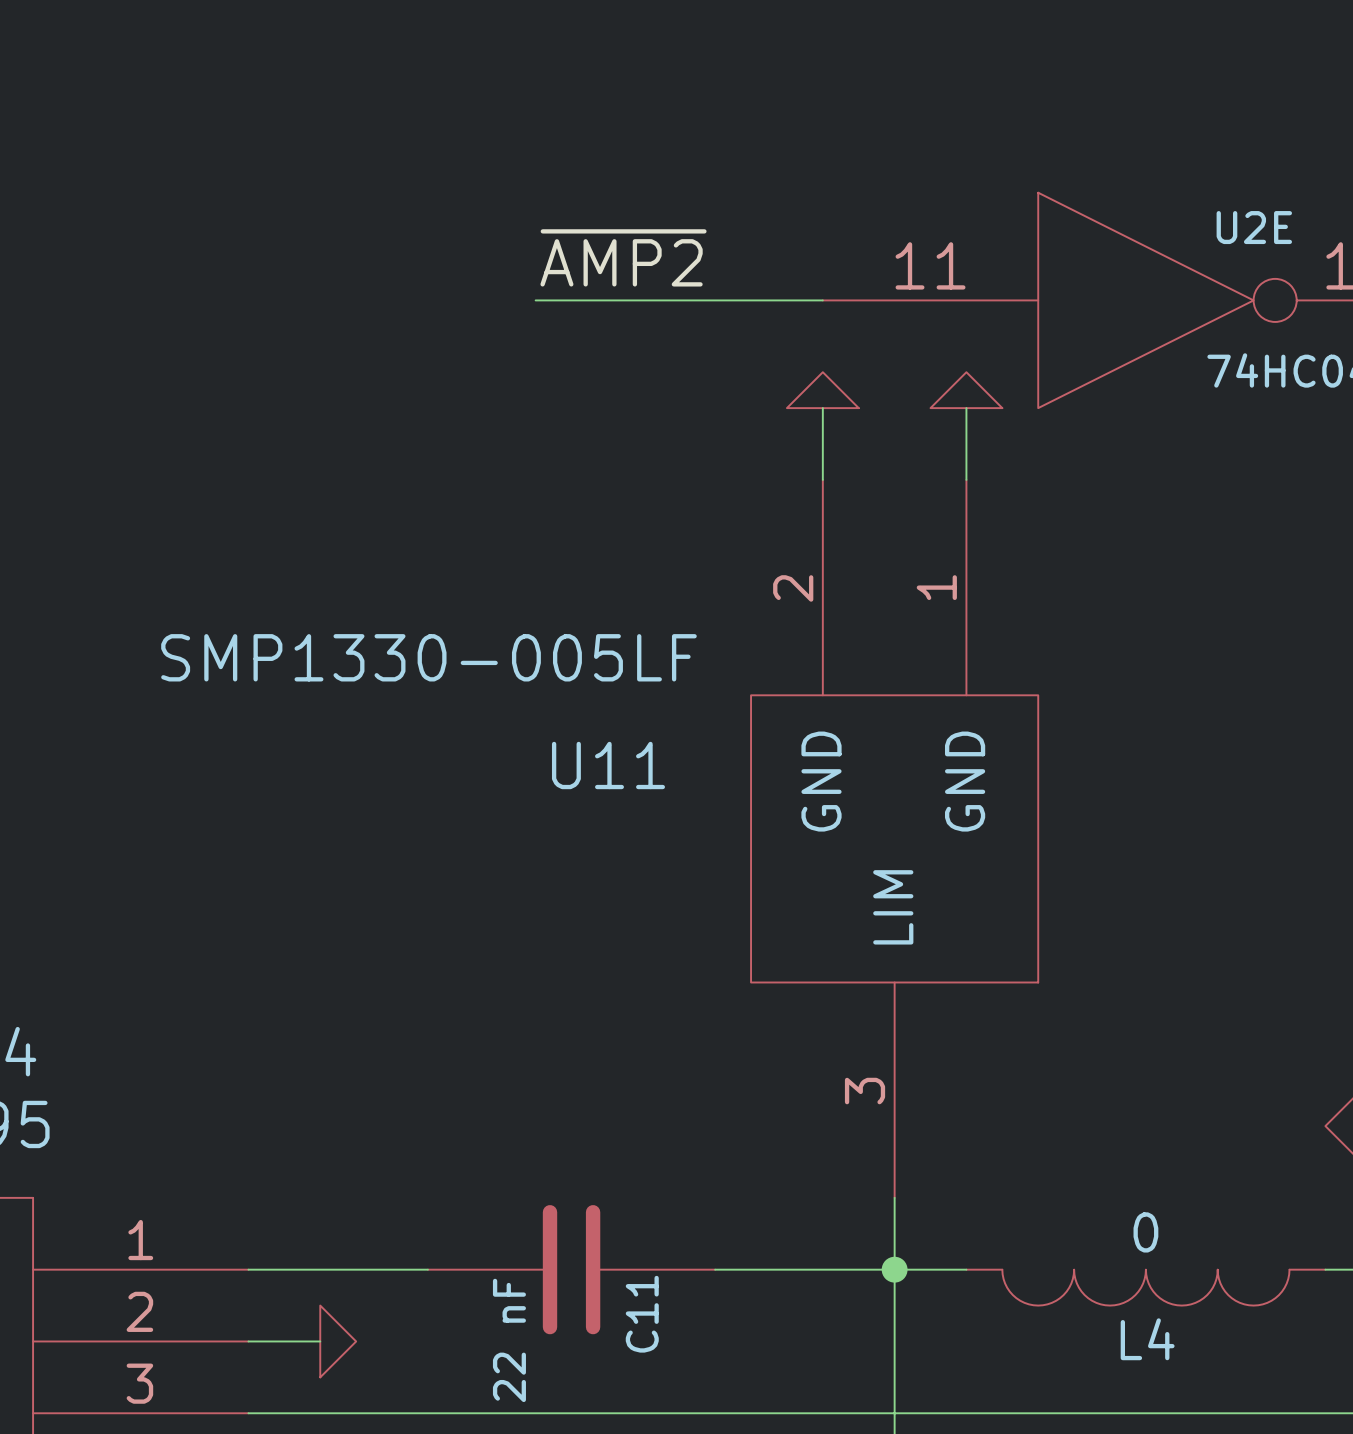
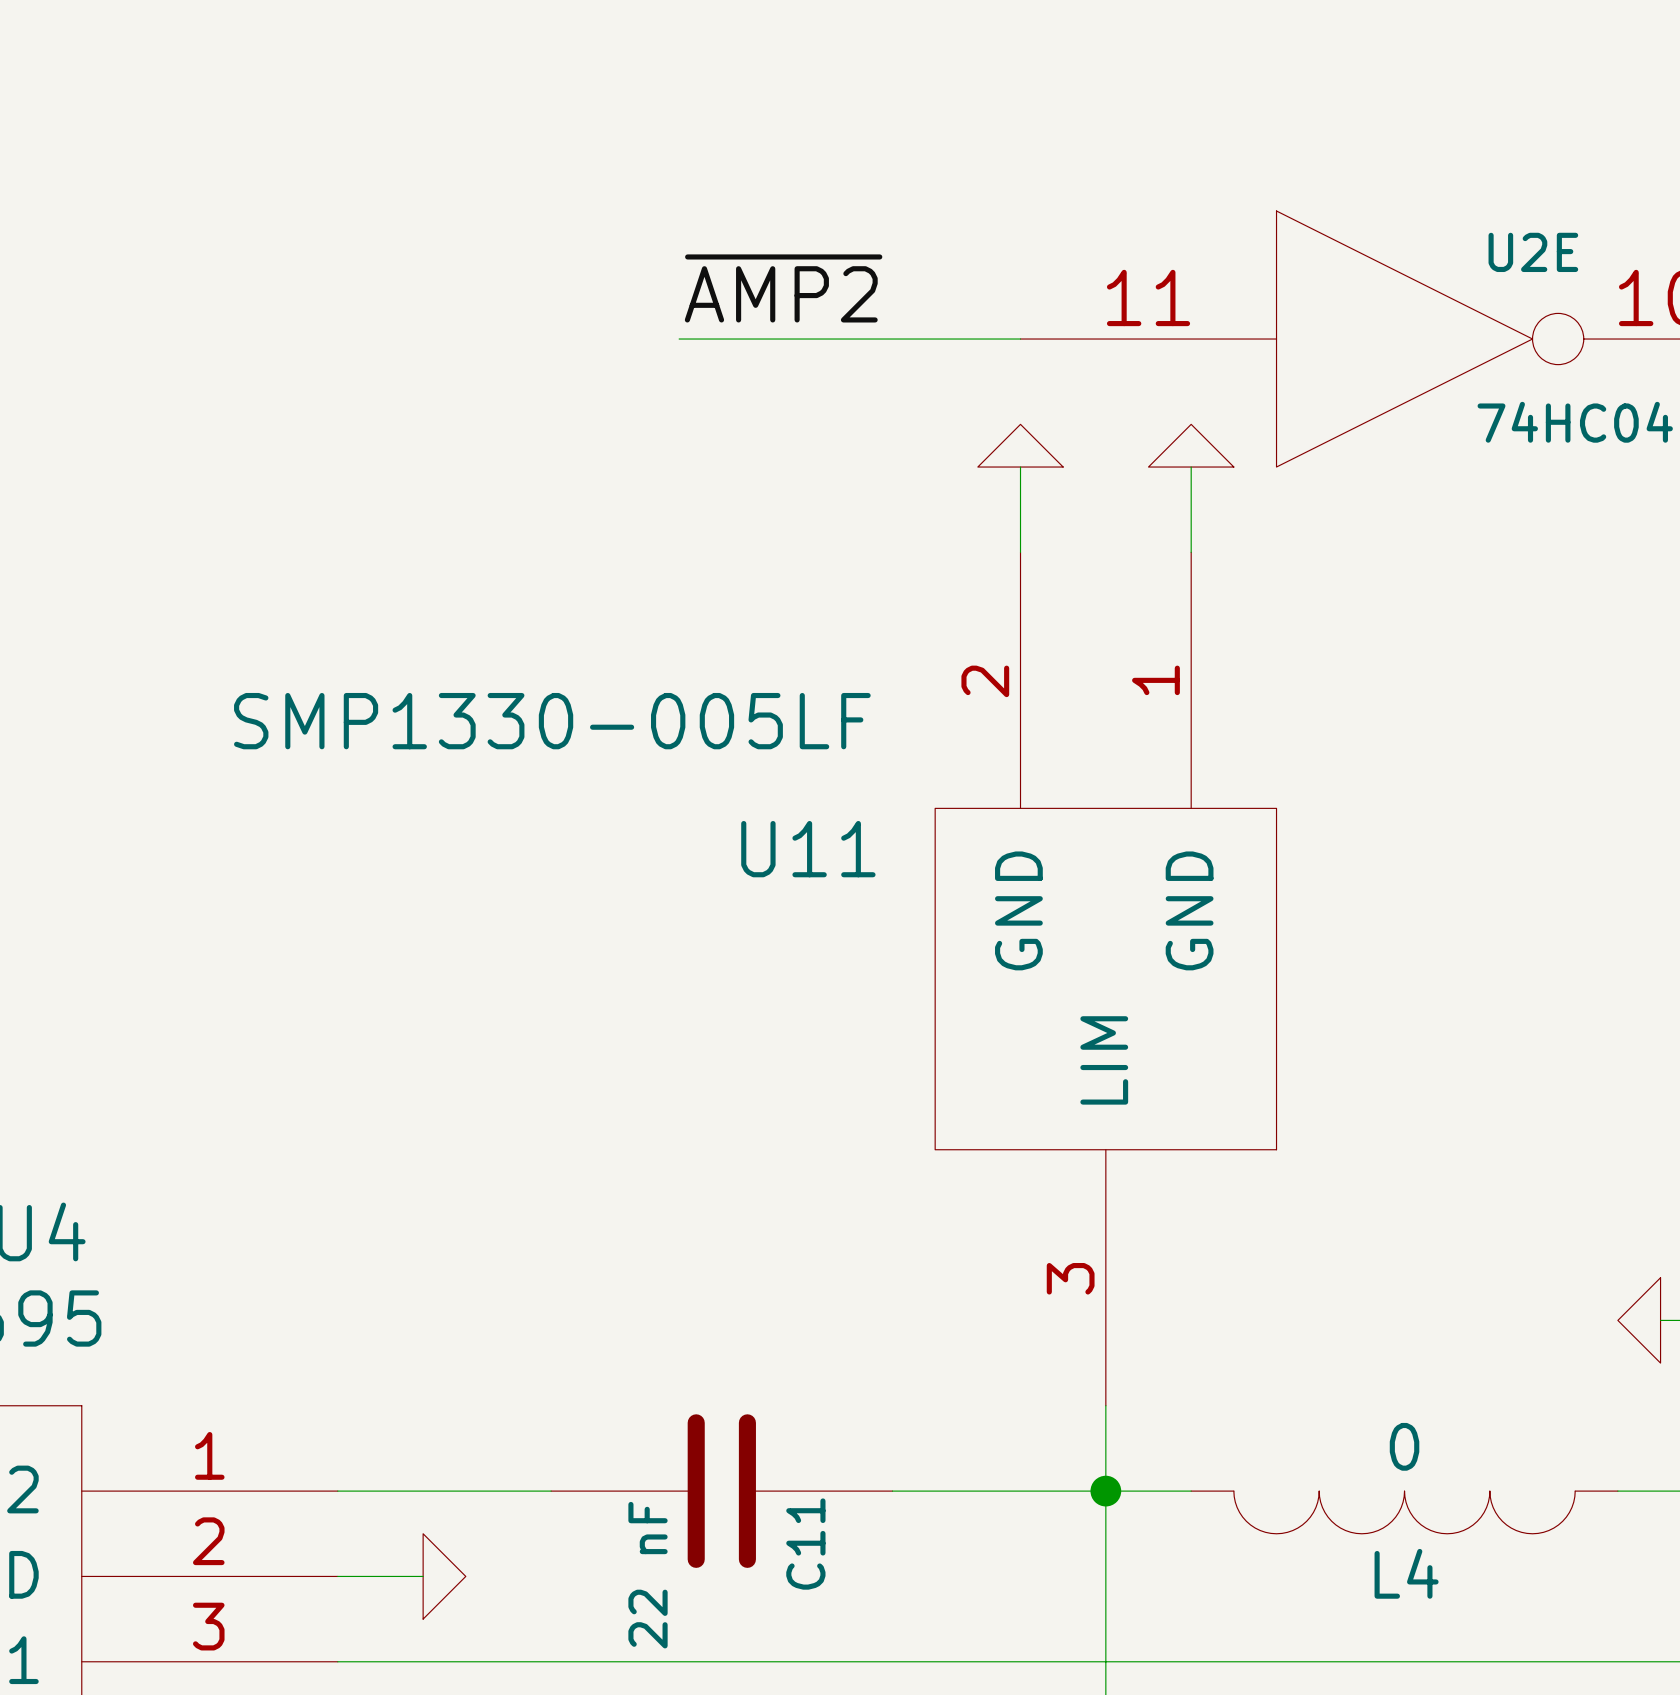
U11 value position: SMP1330-005LF (428, 657) -> SMP1330-005LF (552, 721)
U11 name position: U11 (608, 765) -> U11 (808, 849)

